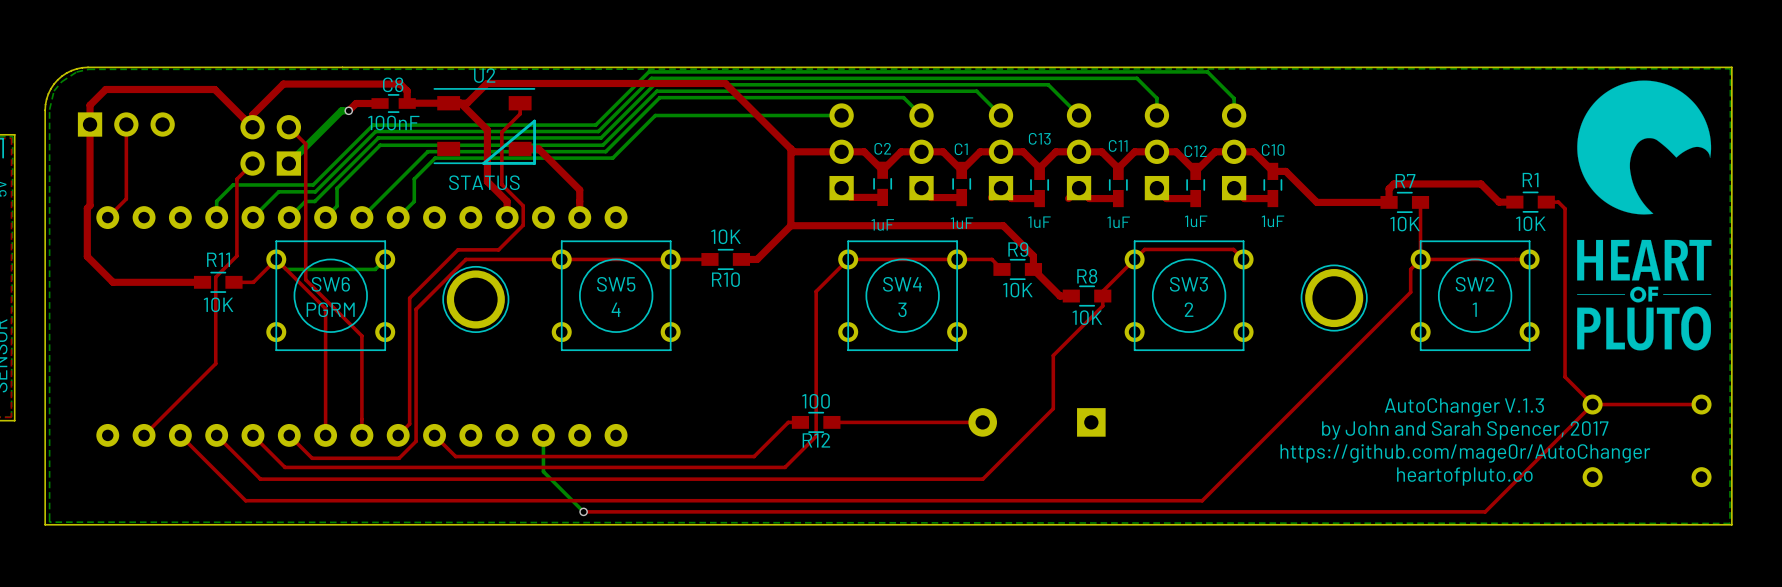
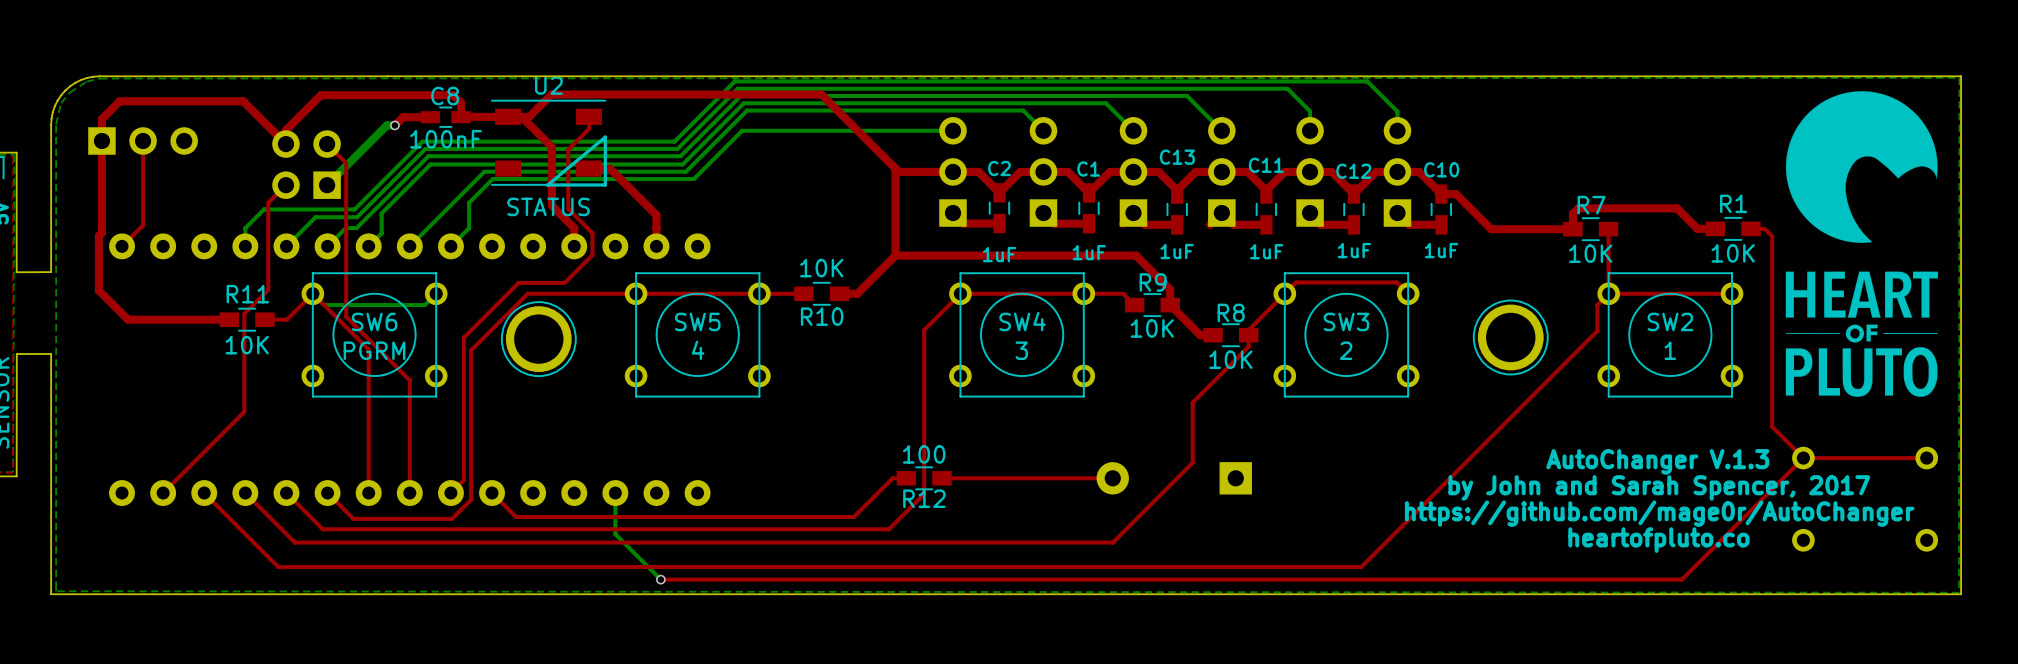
board edge: (14, 240) (14, 420) -> (51, 354) (16, 354) (16, 476)
board edge: (45, 240) (45, 312) -> (51, 272) (16, 272)

